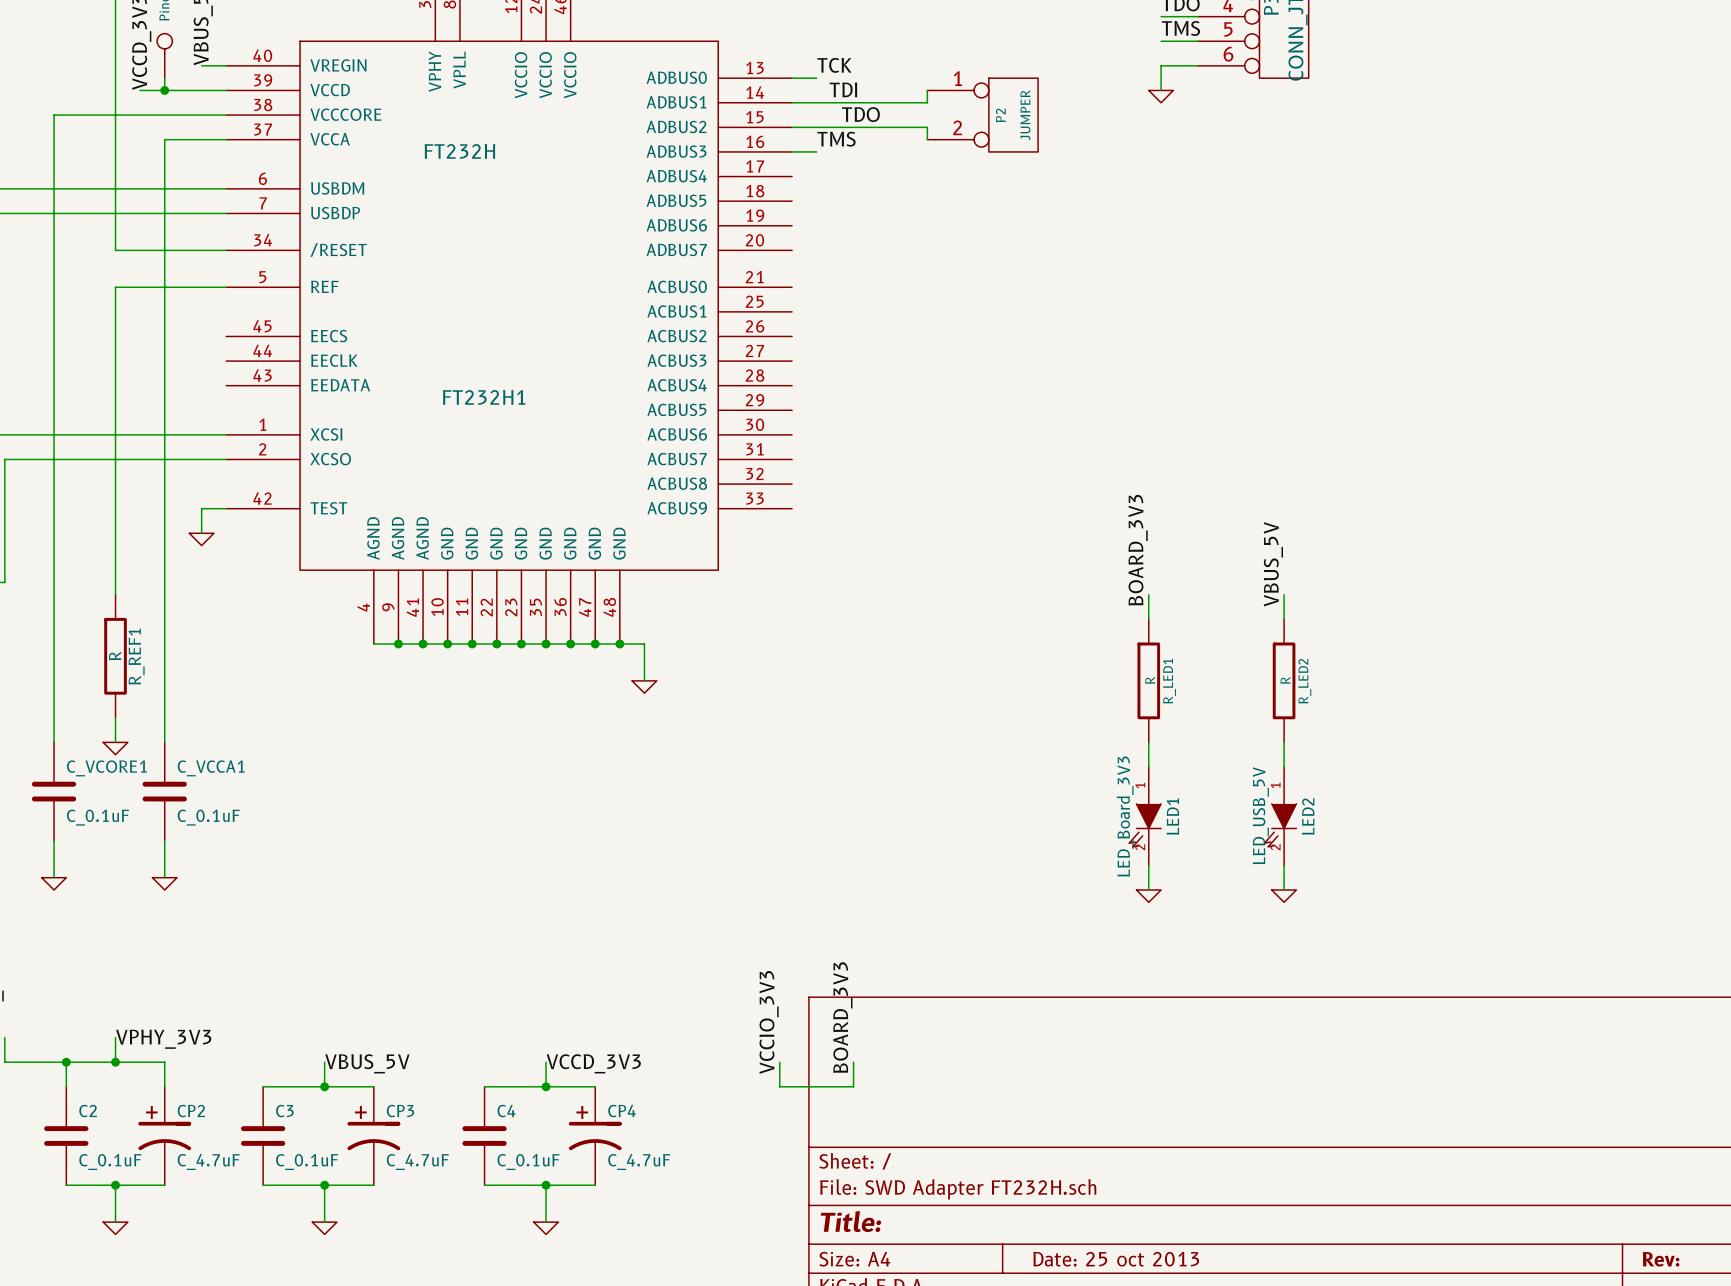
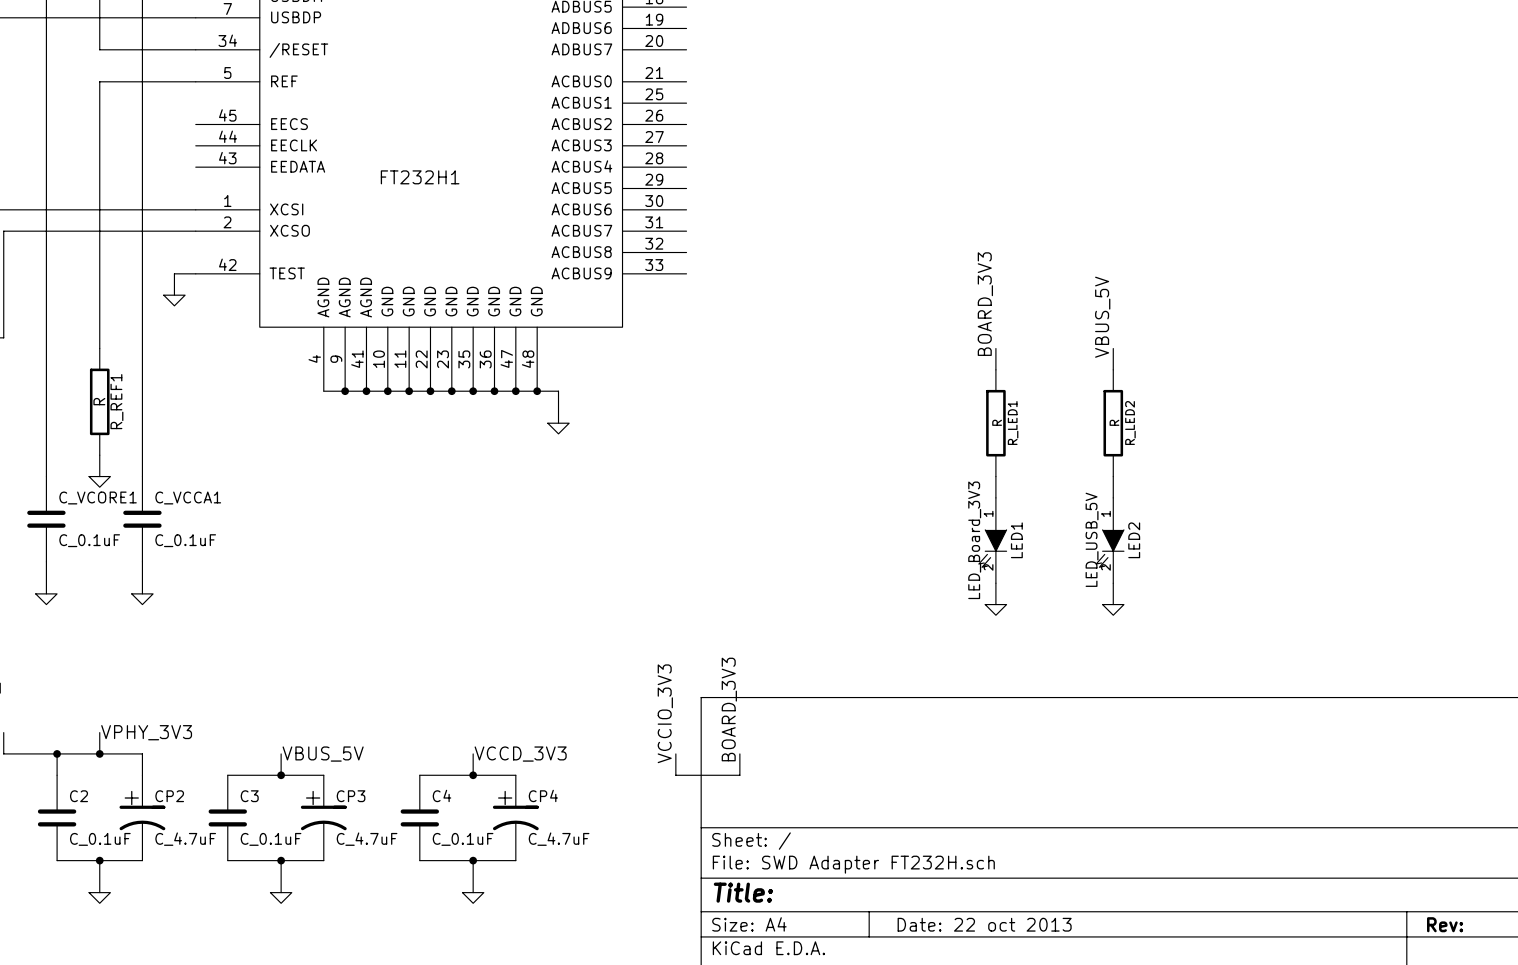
title block: Date: 25 oct 2013 (1116, 1259) -> Date: 22 oct 2013 (984, 924)

